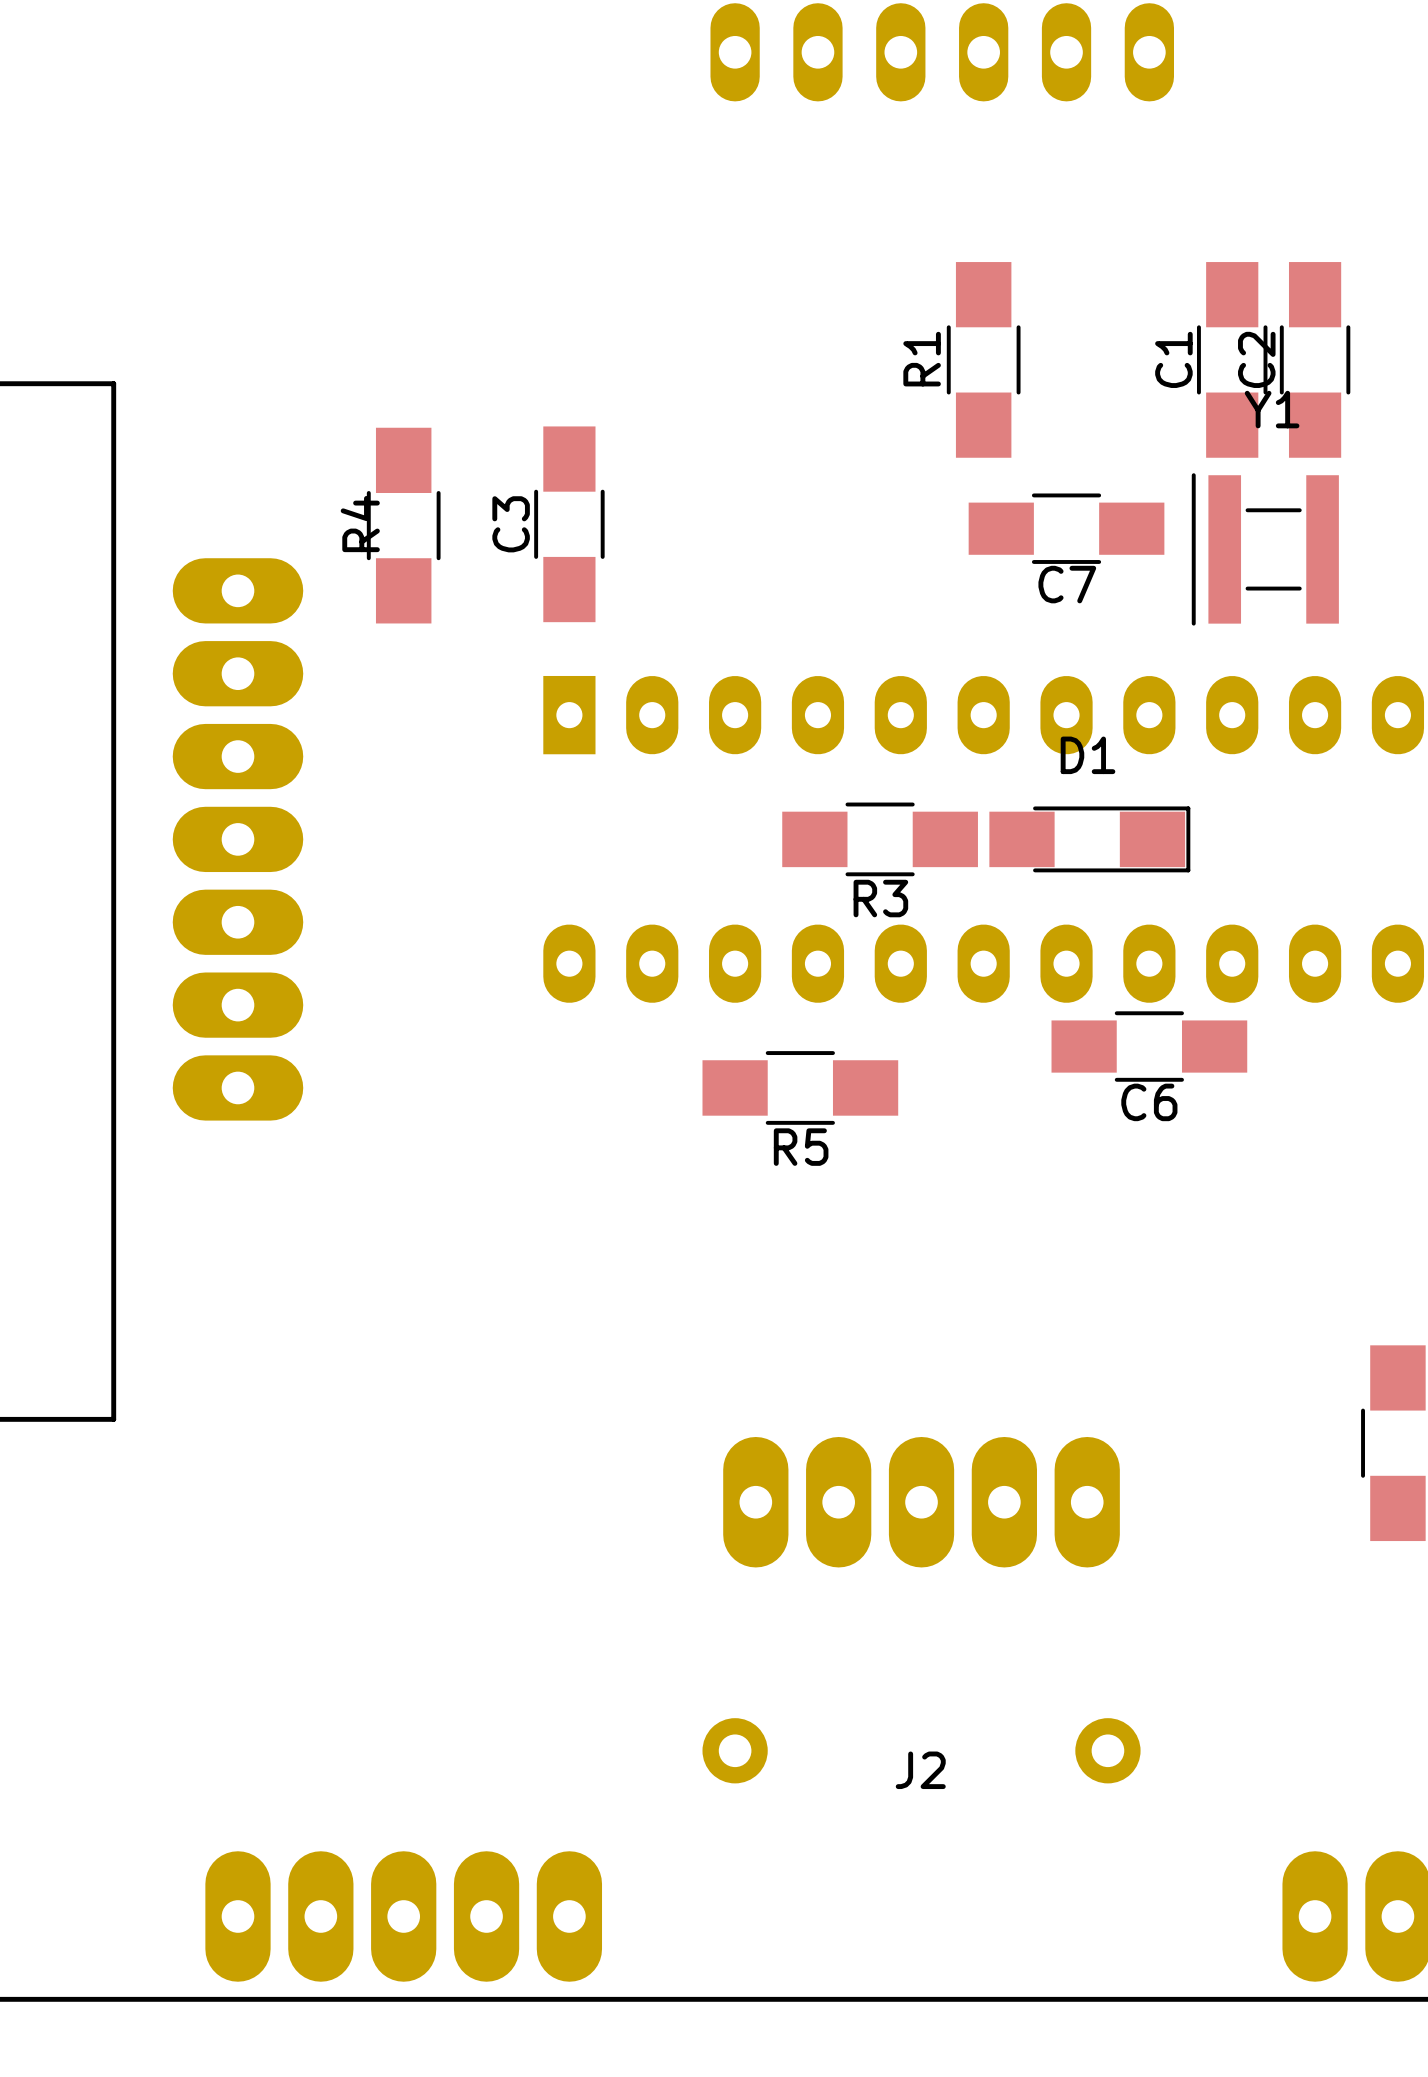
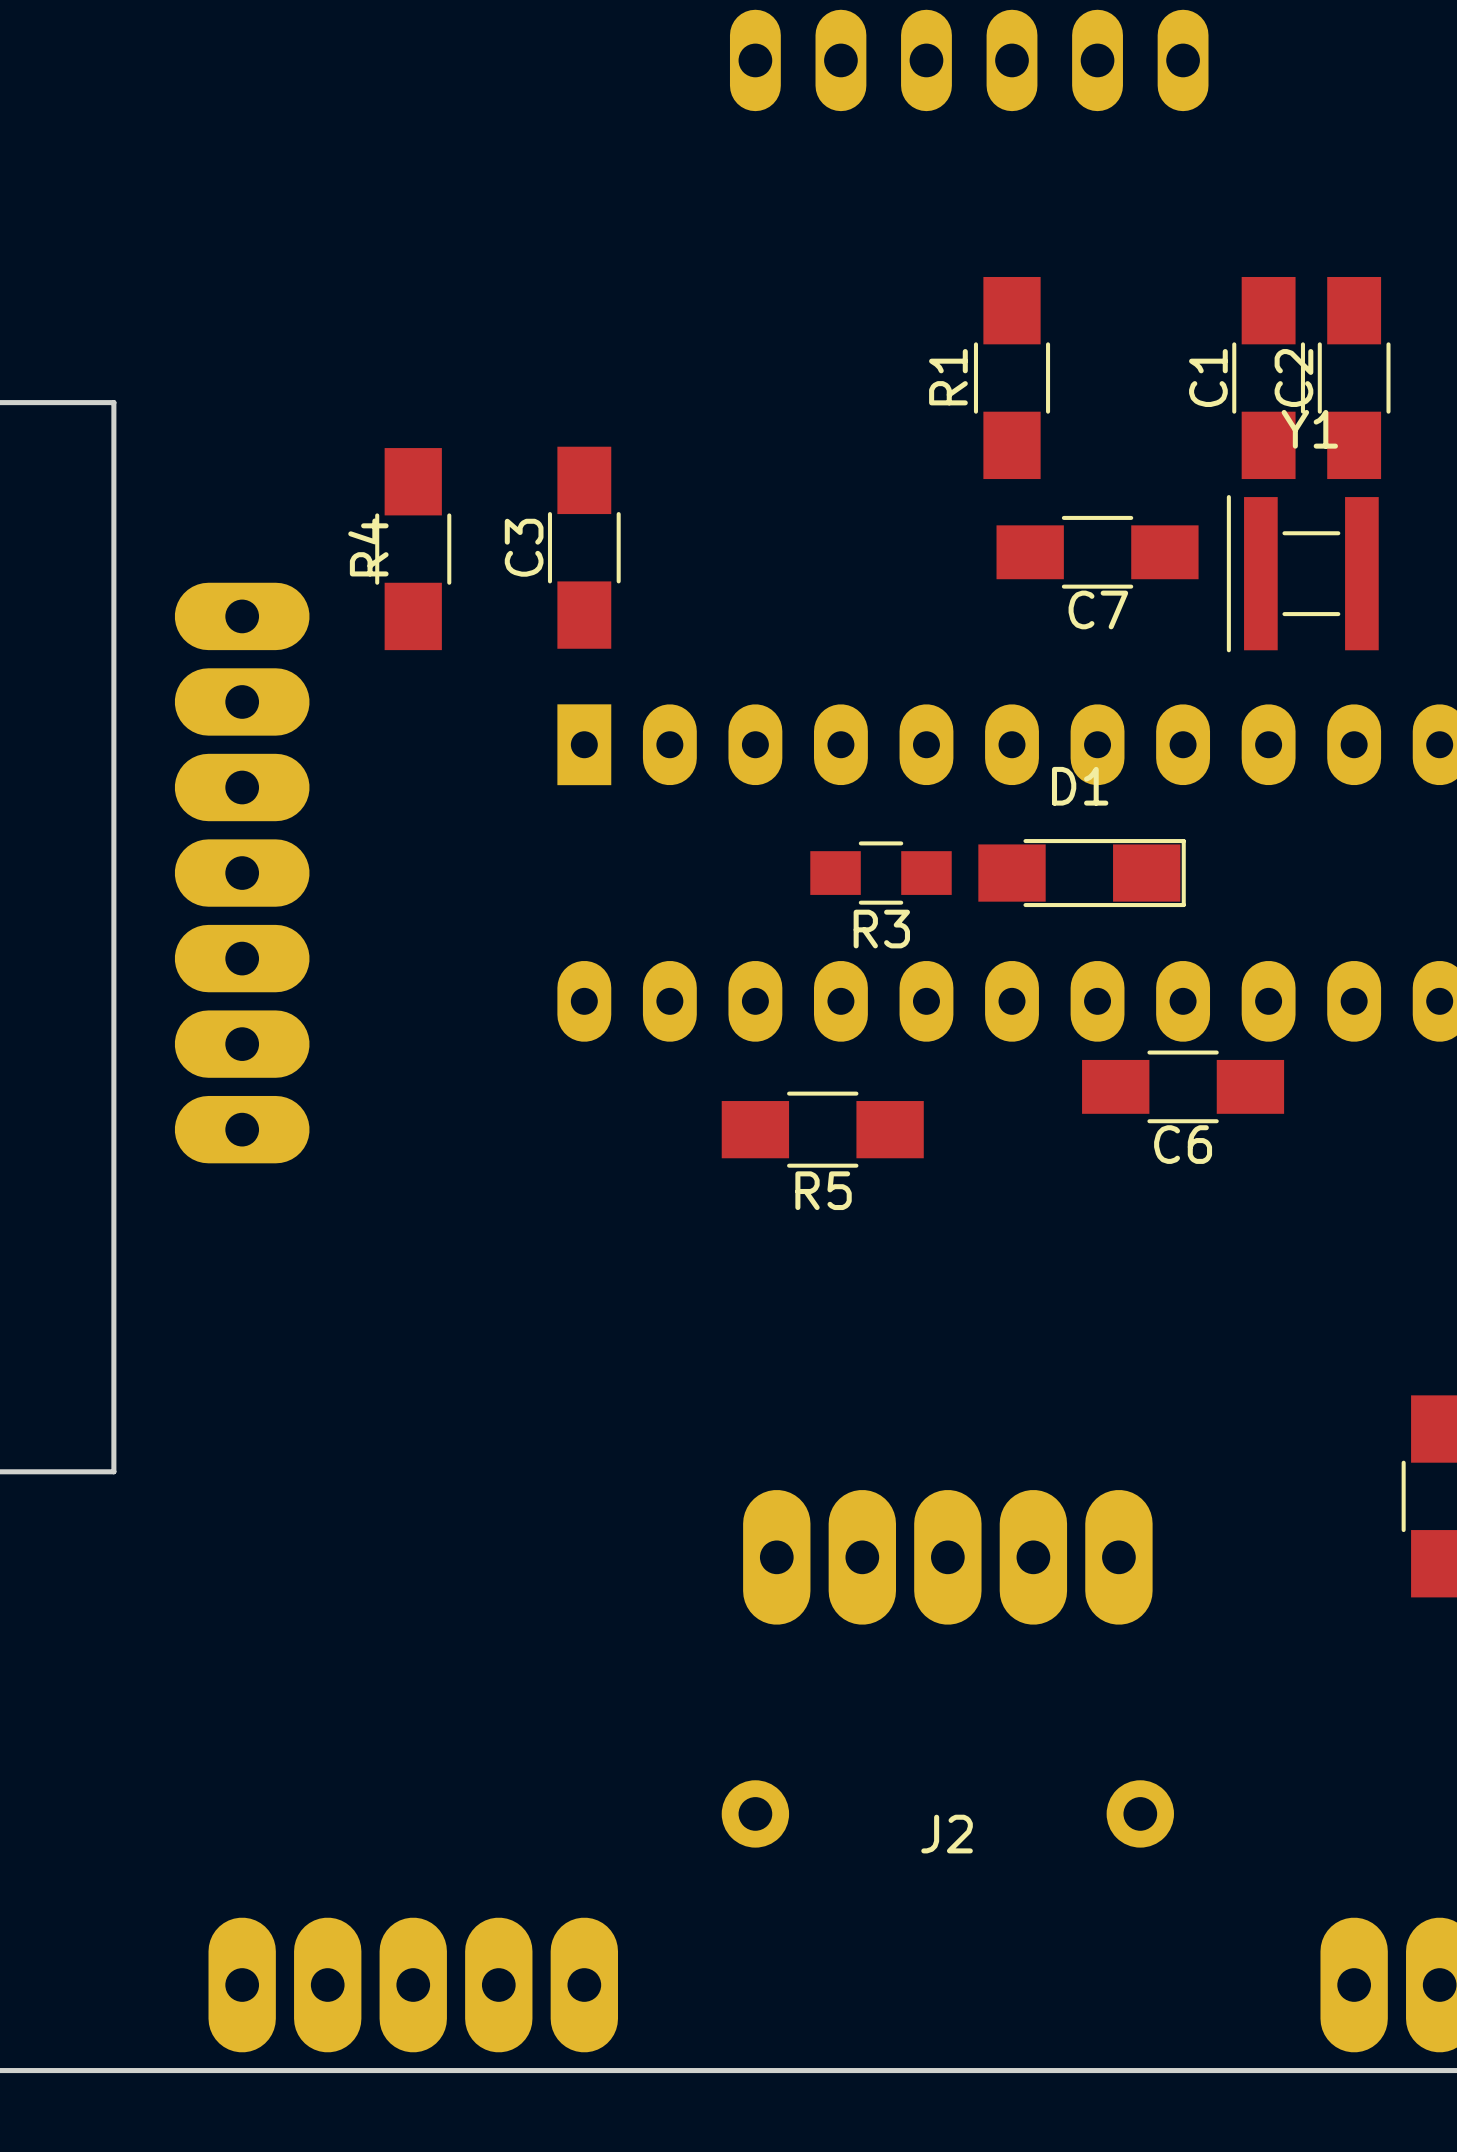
R3 footprint: [782, 802, 978, 877] -> [810, 841, 952, 905]
D1 position: (1089, 839) -> (1082, 873)

